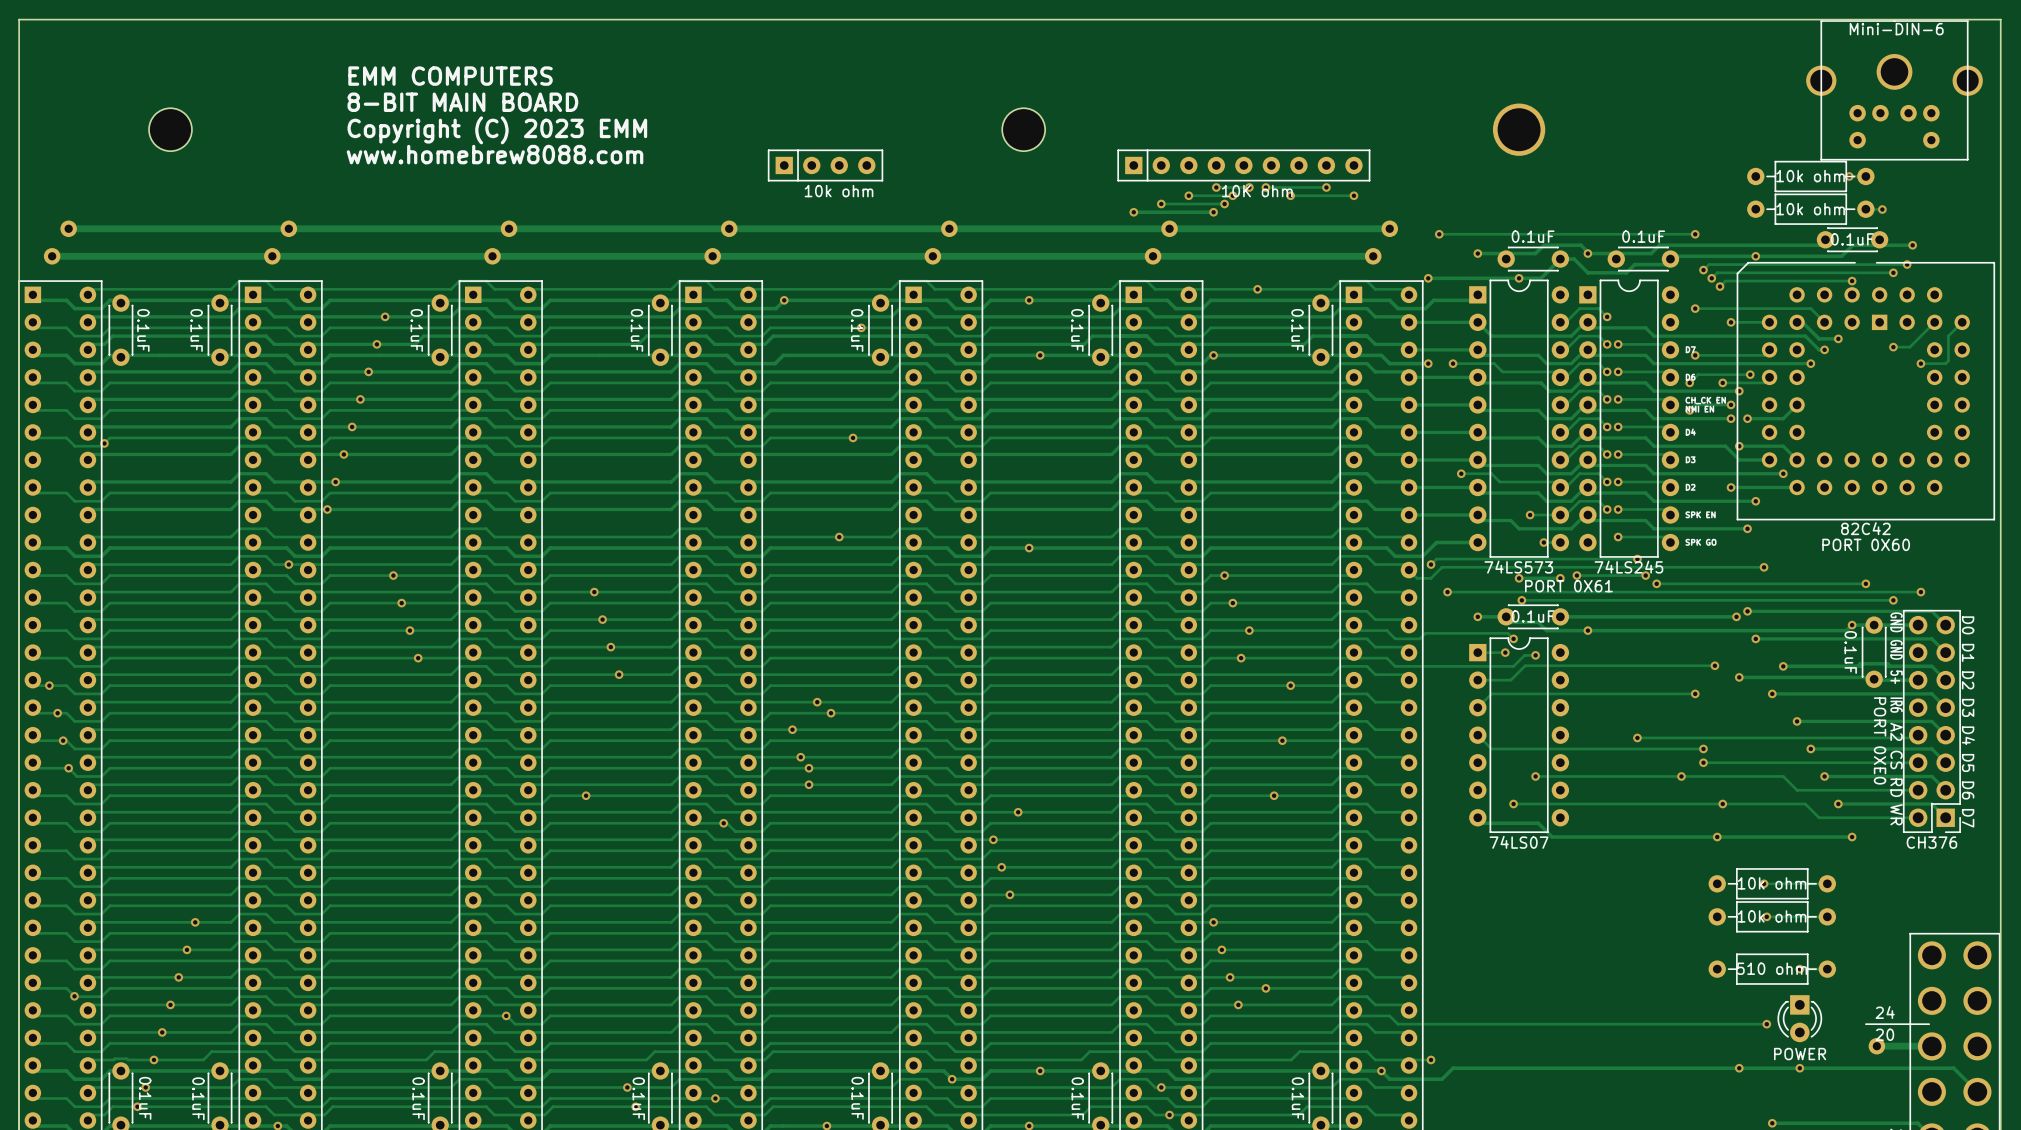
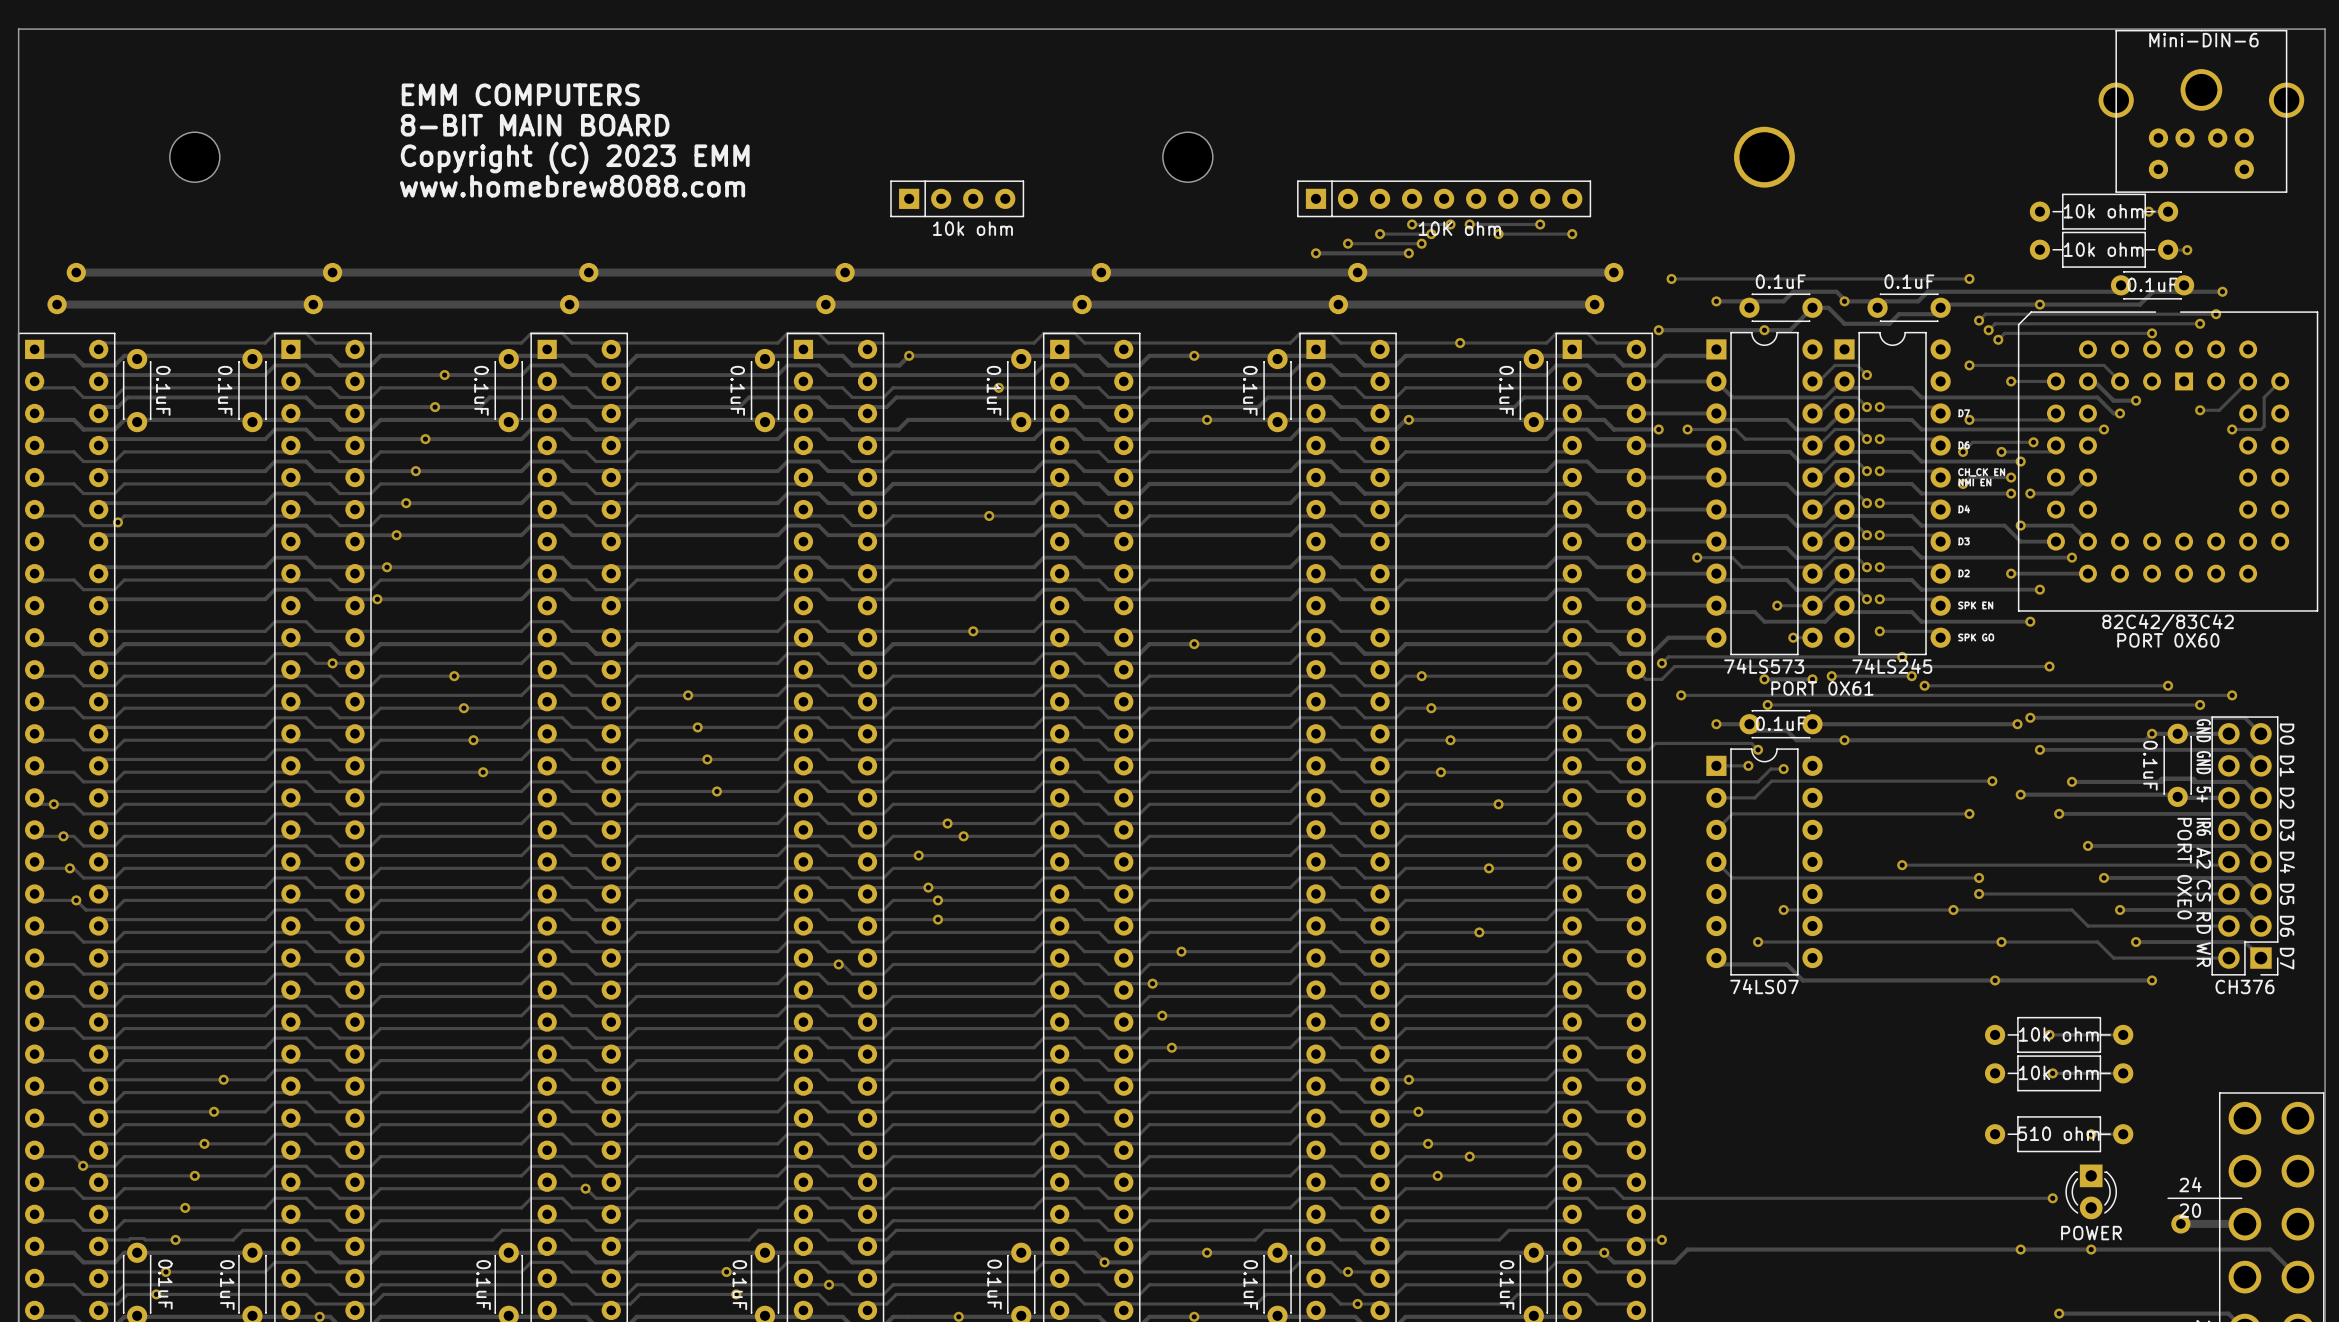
part value: 82C42 (1865, 528) -> 82C42/83C42 (2168, 623)
via: (586, 795) -> none

